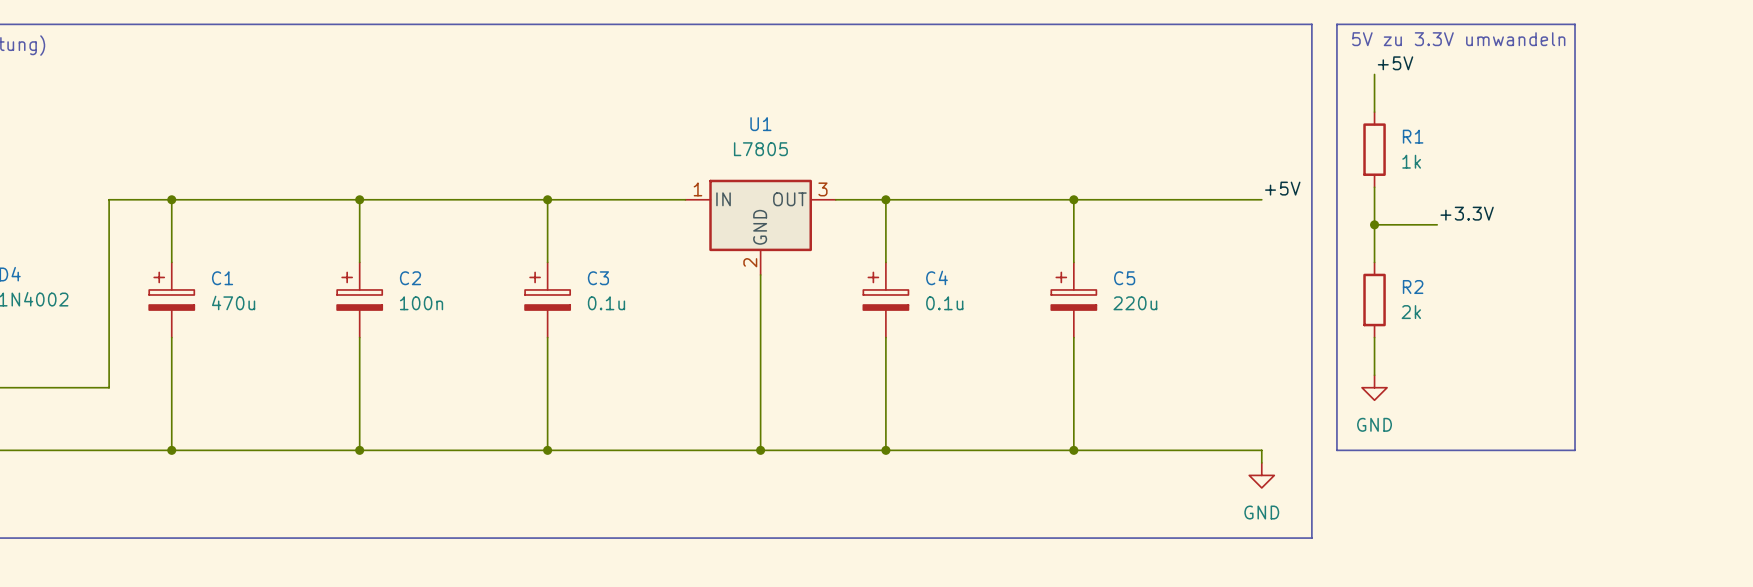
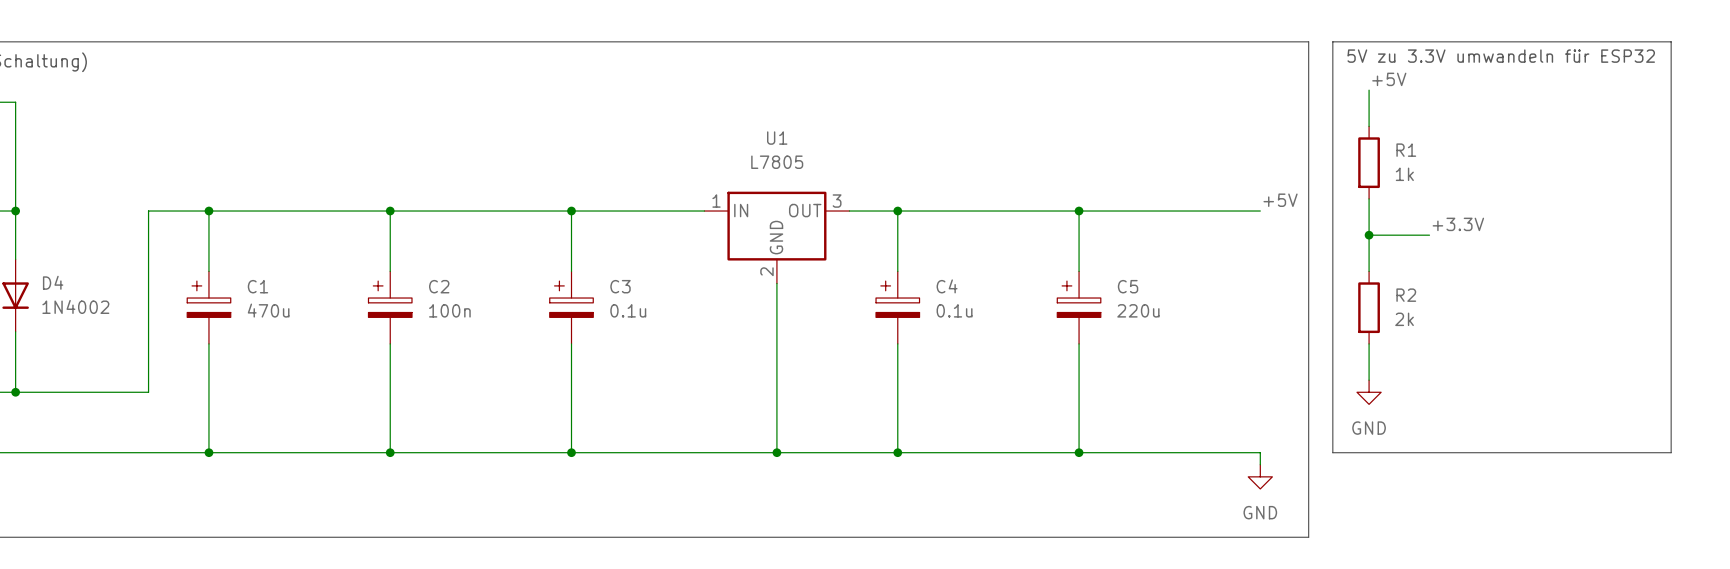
line: (1575, 24) (1575, 450) -> (1562, 41) (1671, 41) (1671, 452) (1562, 452)
text: 5V zu 3.3V umwandeln (1458, 39) -> 5V zu 3.3V umwandeln für ESP32 (1501, 56)

